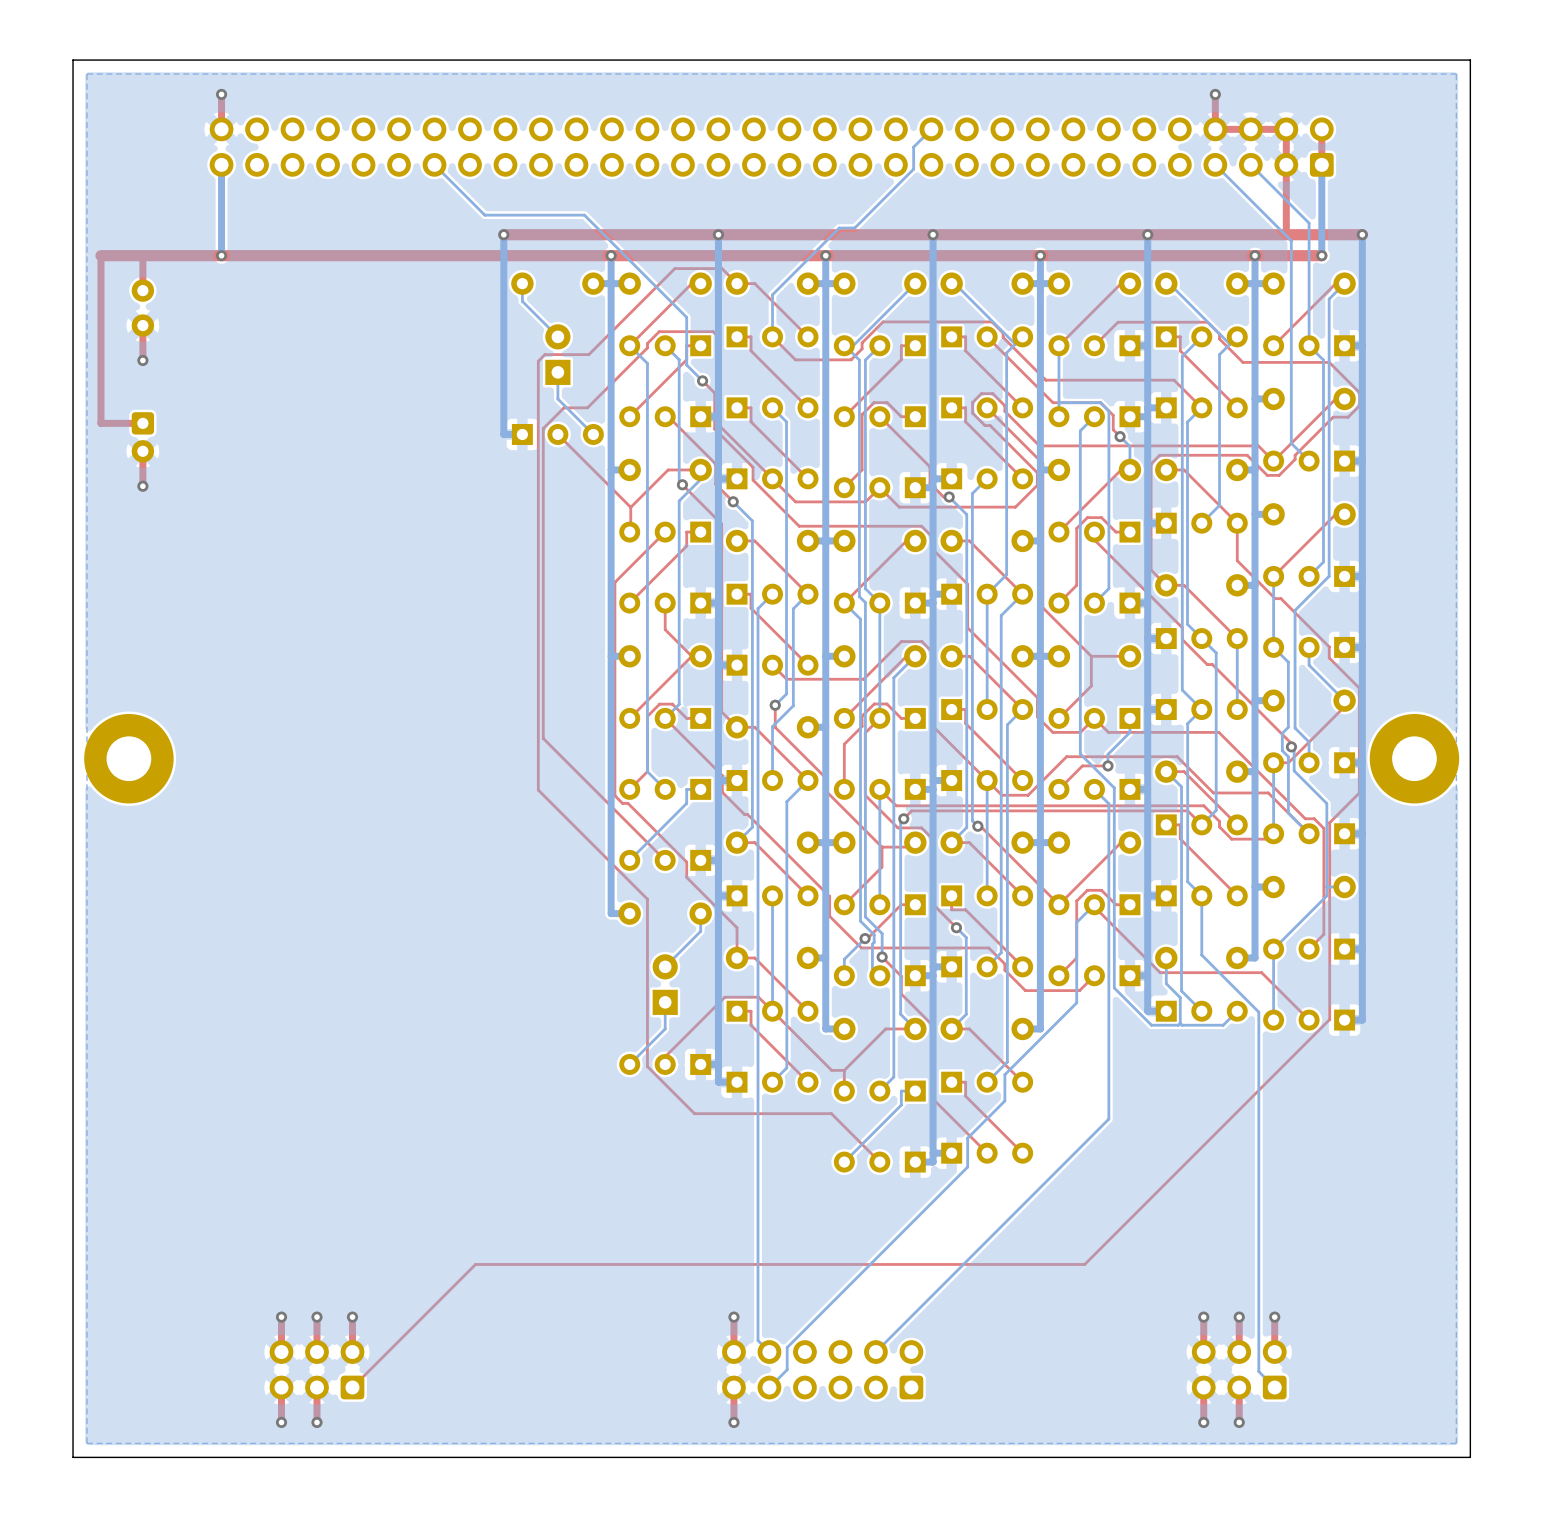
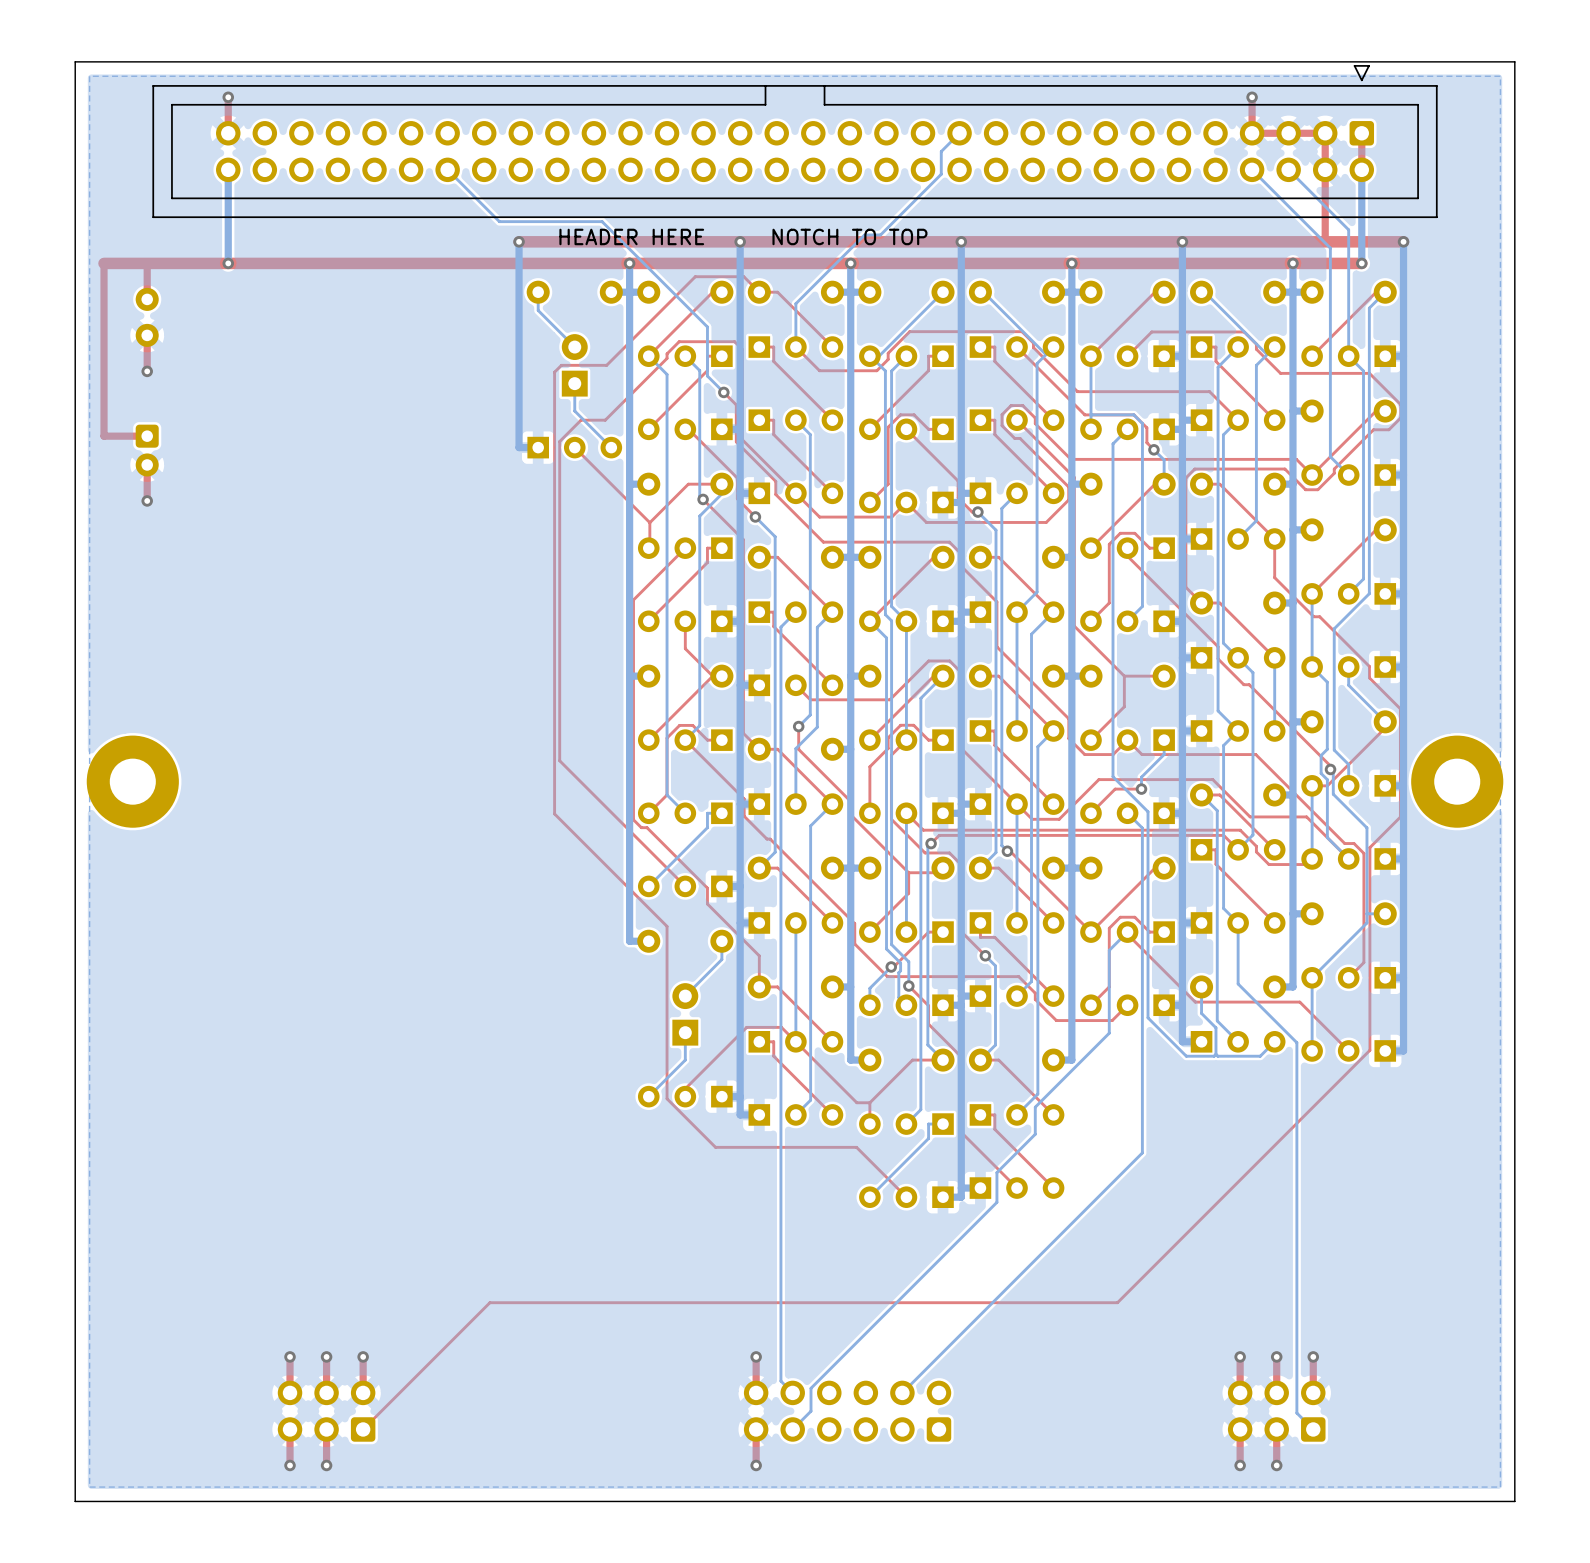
part side: top (771, 147) -> bottom (795, 141)
text: none -> HEADER HERE (631, 236)
text: none -> NOTCH TO TOP (849, 236)

